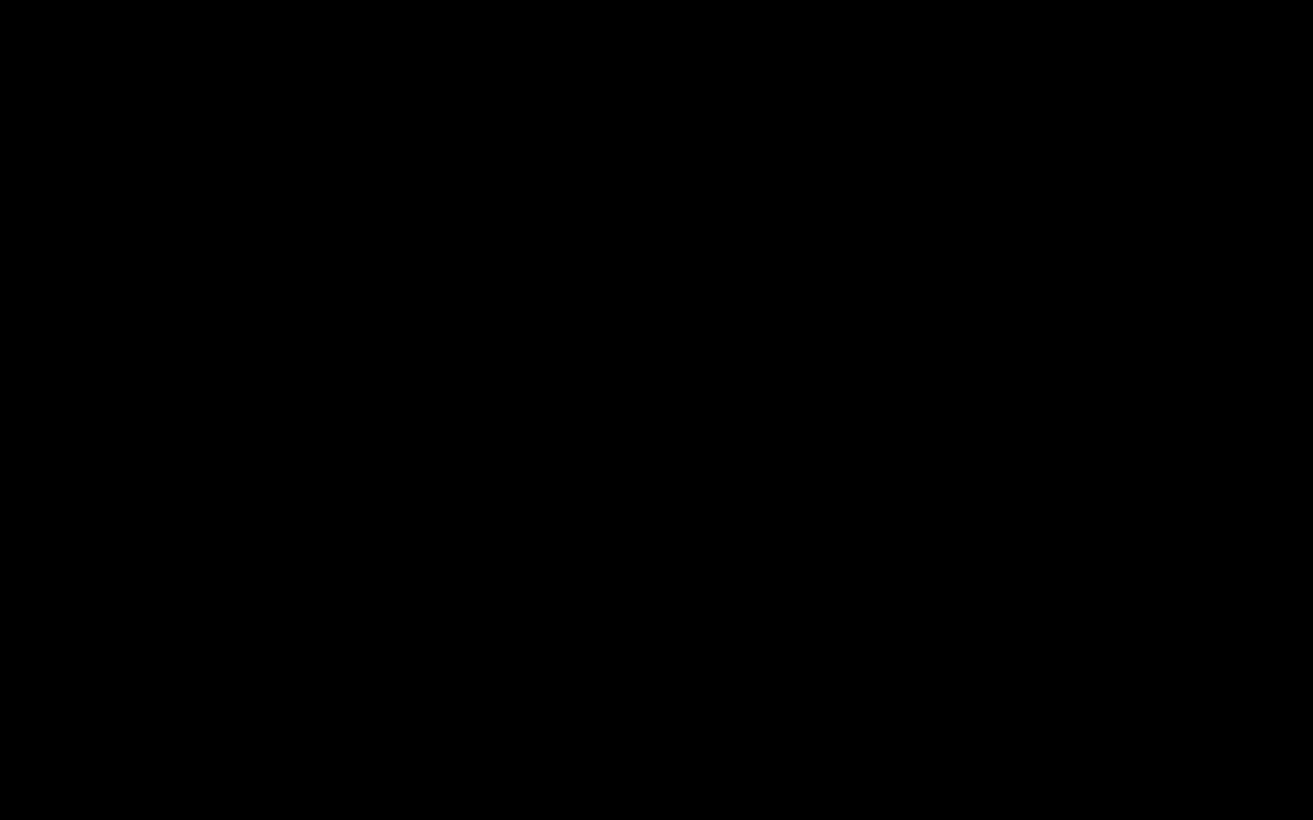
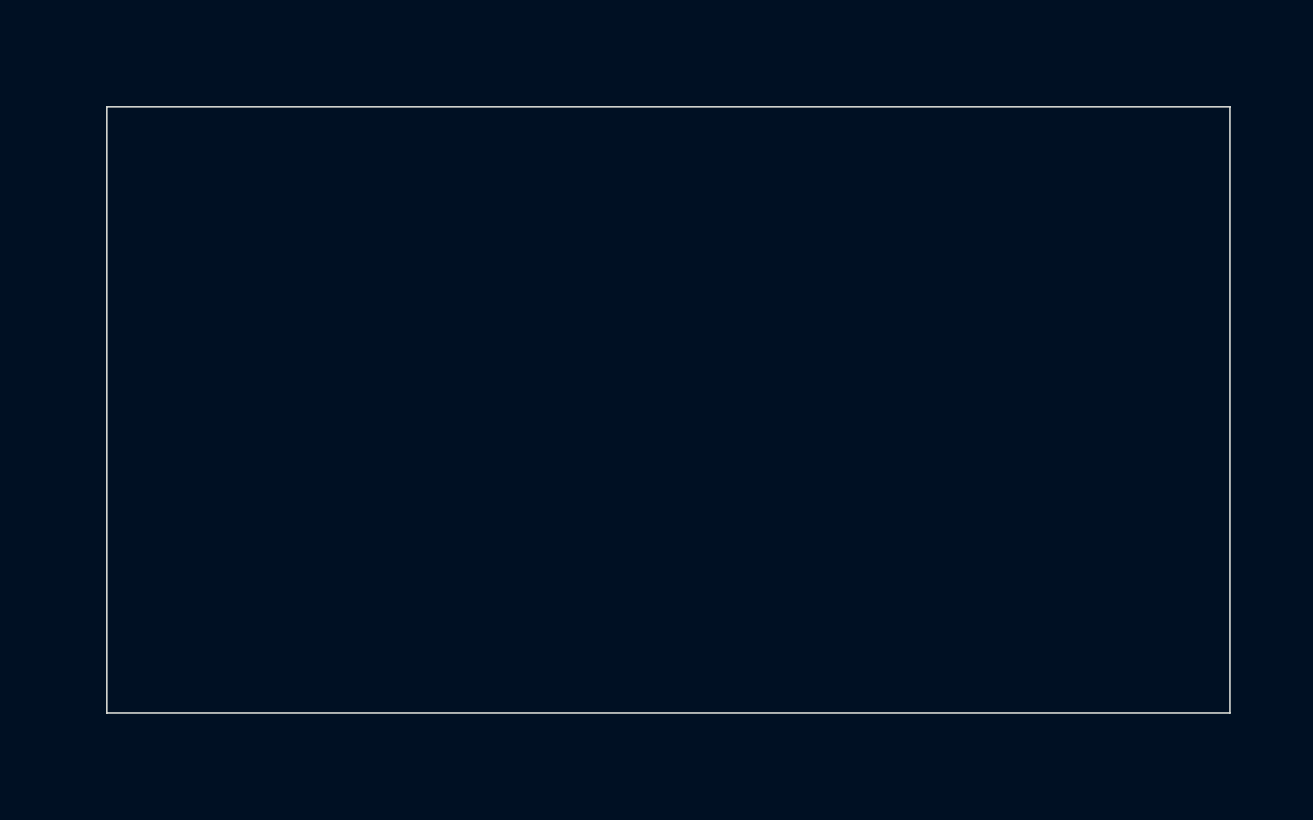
board edge: none -> (106, 106) (1229, 106) (1229, 712) (106, 712) (106, 106)

